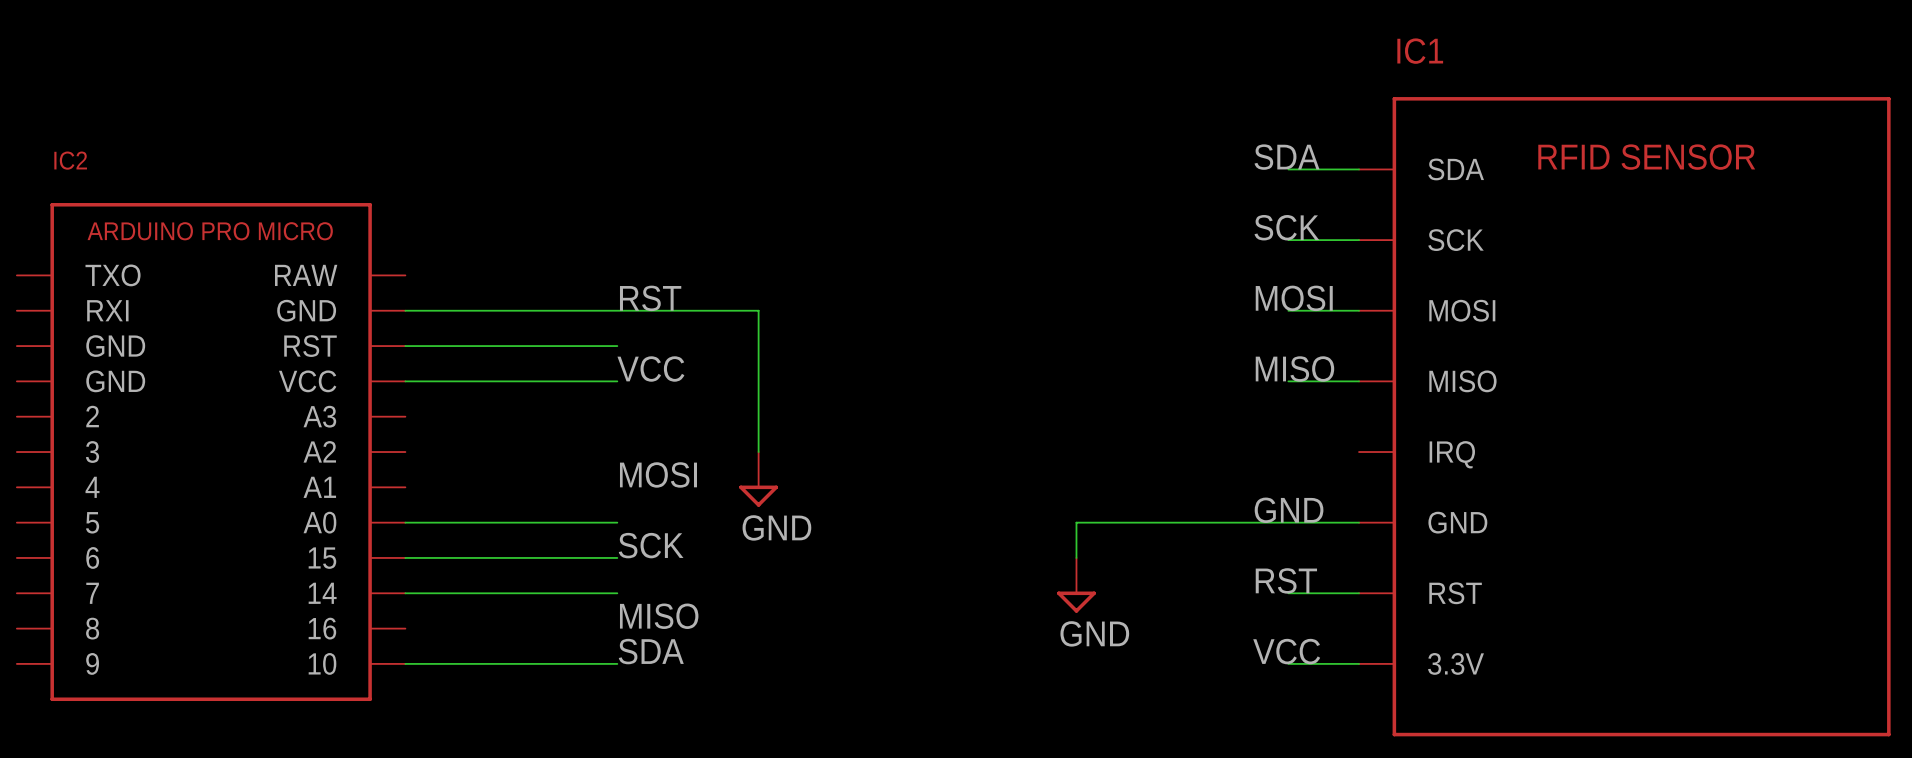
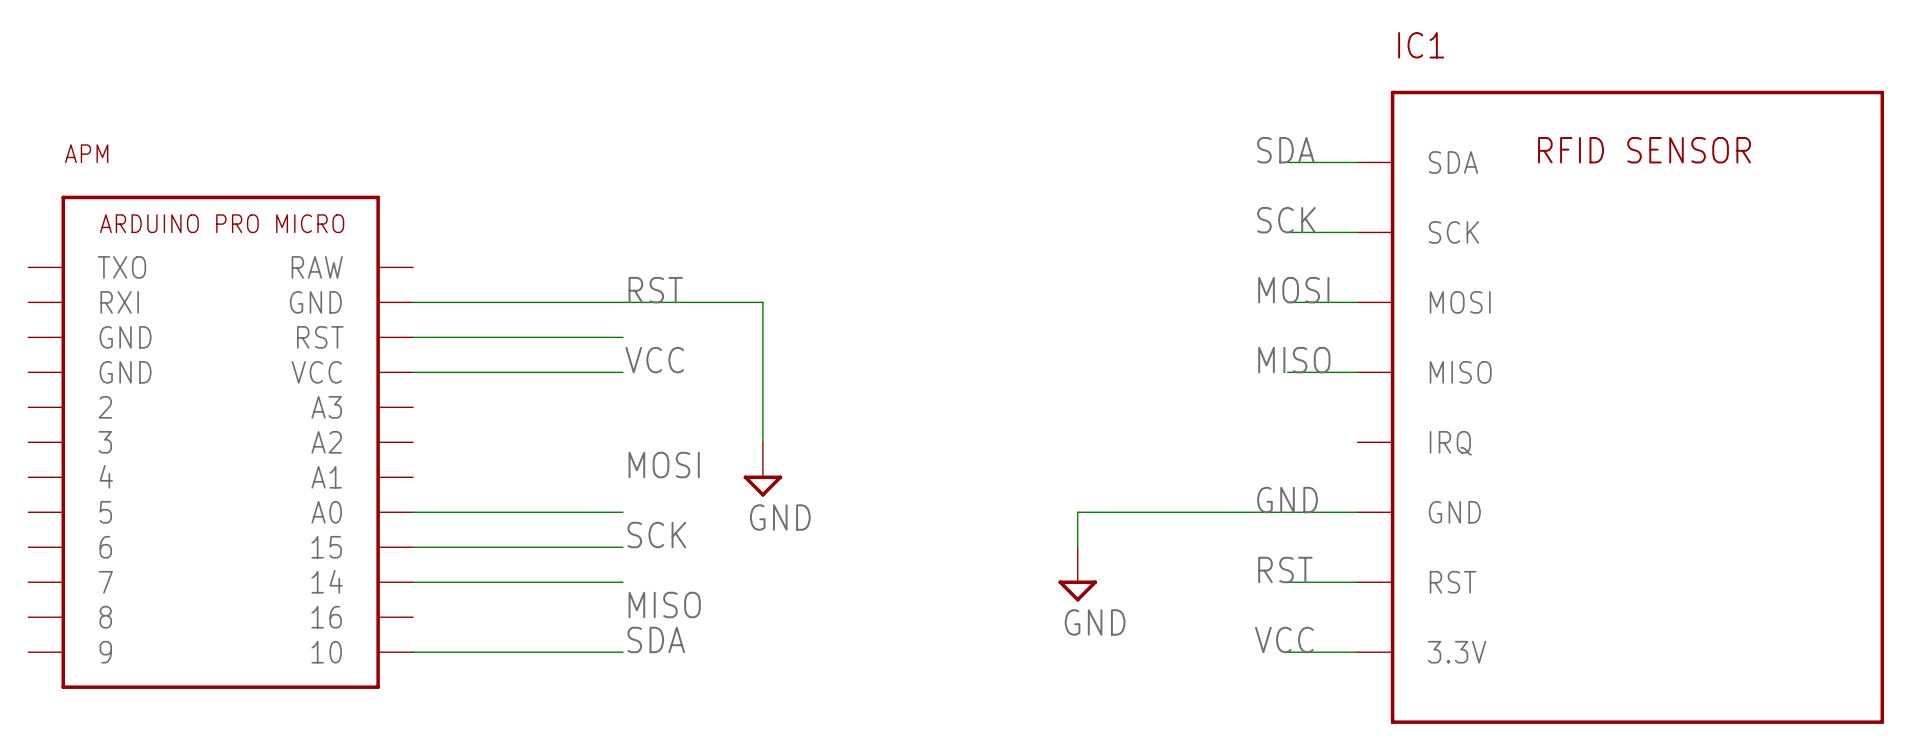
IC2 name: IC2 (70, 160) -> APM (86, 153)

